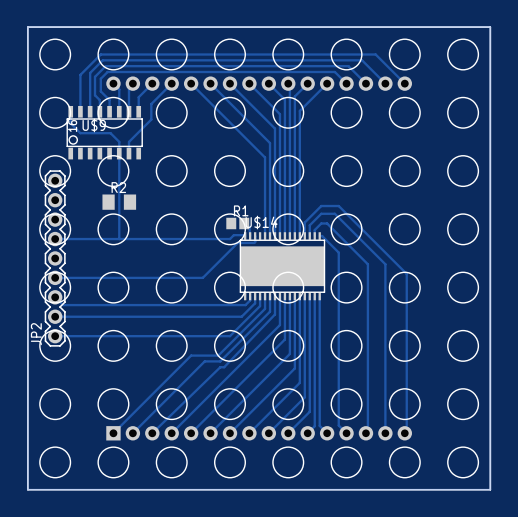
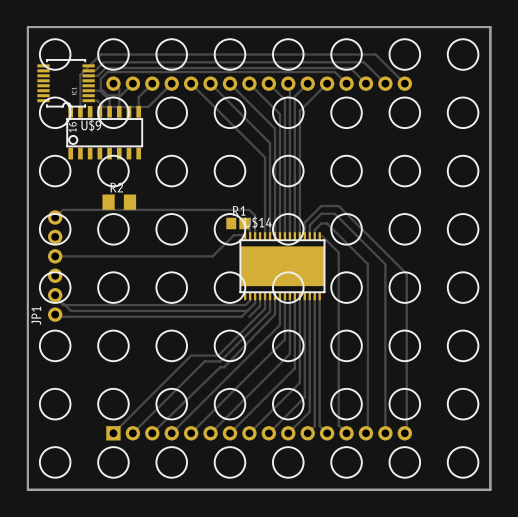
track: (364, 62) (362, 60) (102, 60) (90, 72) (90, 111) -> (364, 62) (103, 62) (95, 70) (88, 70)
track: (350, 68) (348, 66) (105, 66) (95, 76) (95, 95) (99, 100) (99, 111) -> (350, 68) (105, 68) (97, 75) (88, 75)
part: none -> (66, 83)
track: (128, 87) (128, 111) -> (128, 87) (121, 95) (107, 95) (103, 90) (88, 90)
track: (151, 104) (151, 119) (128, 141) (128, 153) -> (151, 104) (148, 106) (103, 106) (97, 100) (88, 100)
track: (70, 111) (70, 123) (80, 133) (110, 133) (119, 141) (119, 239) -> none
track: (255, 236) (254, 242) (237, 242) (202, 277) (55, 277) -> (255, 236) (255, 215) (249, 209) (62, 209) (55, 217)
track: (55, 239) (230, 239) -> (55, 256) (212, 256) (230, 239)
JP2: (55, 258) -> none
JP1: none -> (55, 266)
track: none -> (55, 295) (70, 310) (247, 310)
track: (249, 316) (230, 336) (55, 336) -> none

